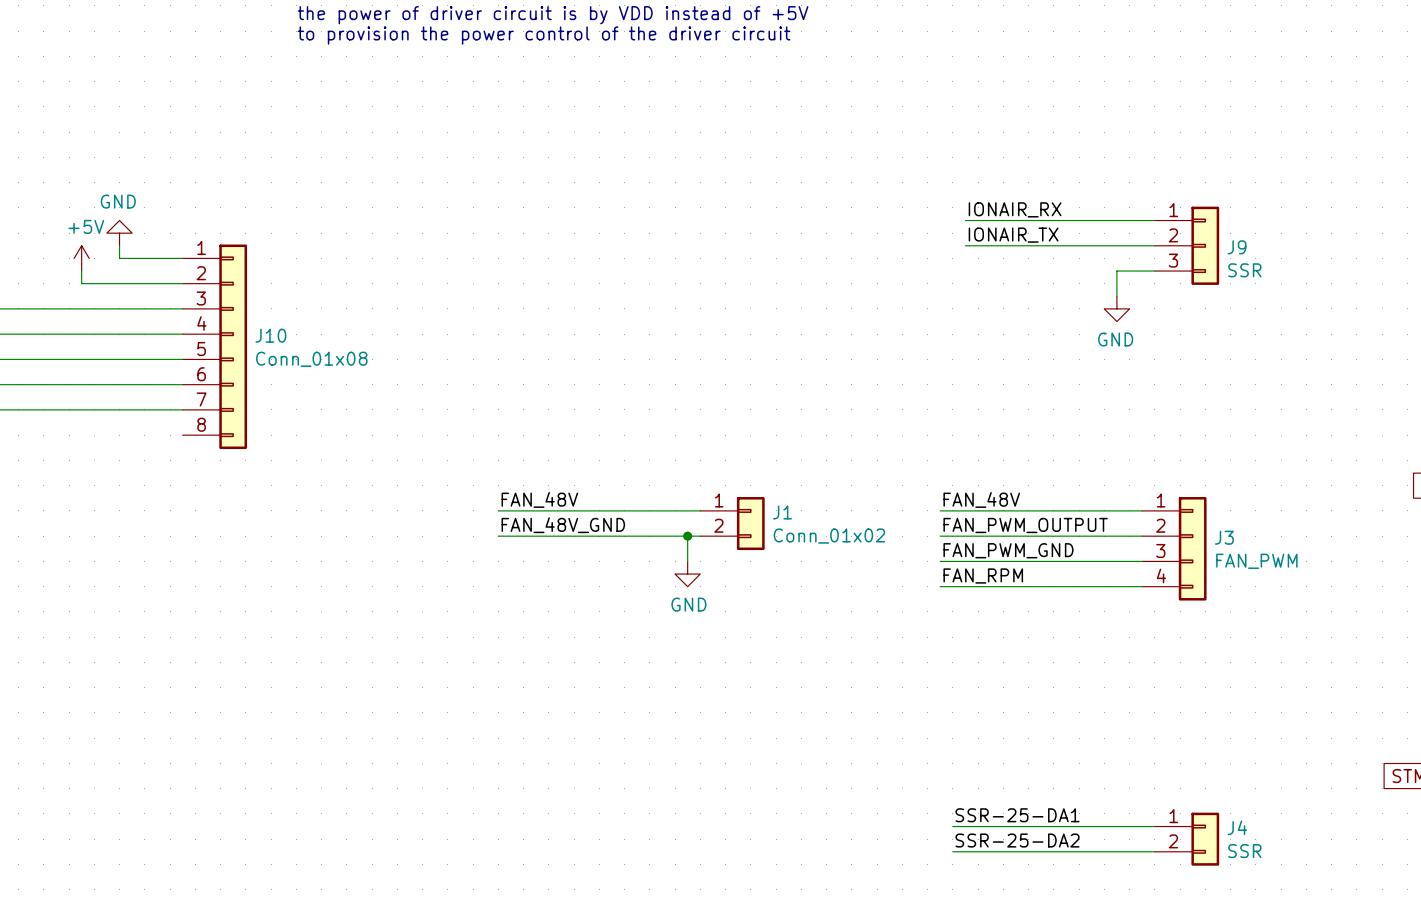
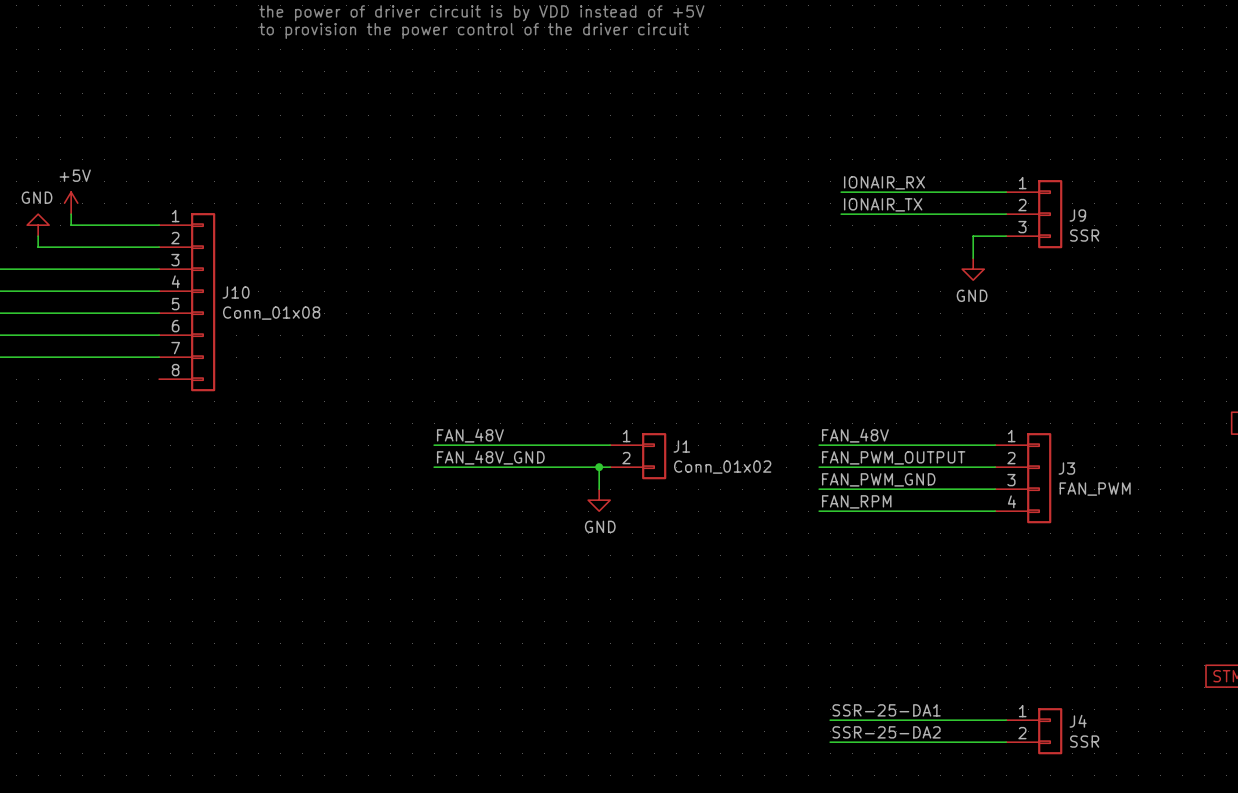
power symbol position: GND (119, 233) -> GND (38, 225)
wire: (119, 245) (119, 258) -> (71, 214) (71, 225) (104, 225)
power symbol position: +5V (81, 258) -> +5V (71, 203)
wire: (81, 271) (81, 283) -> (38, 236) (38, 247) (71, 247)

